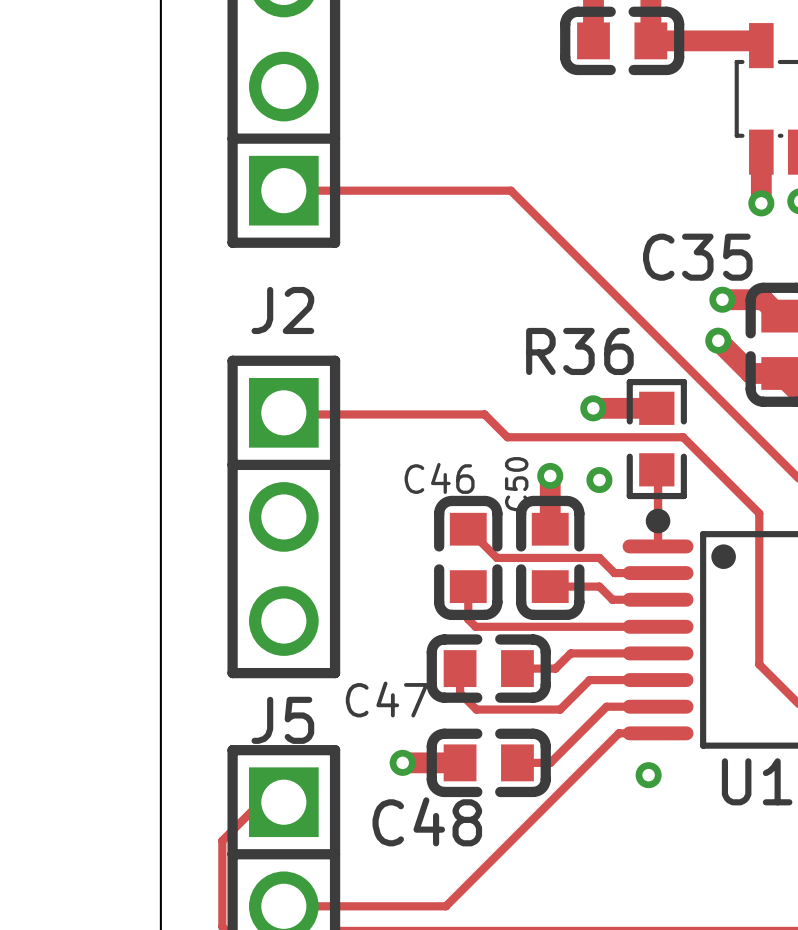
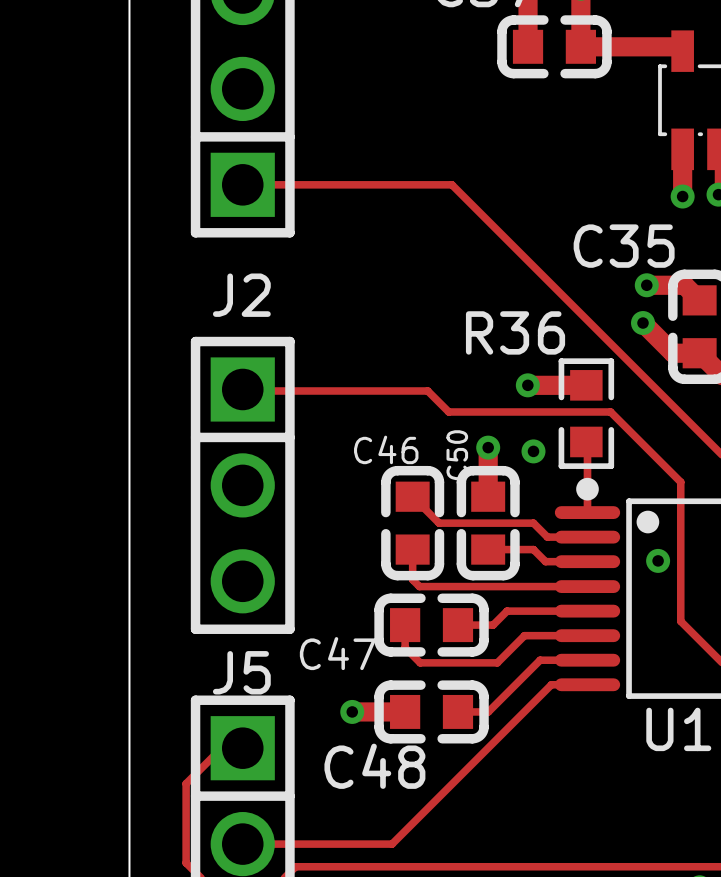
via position: (648, 775) -> (658, 560)

